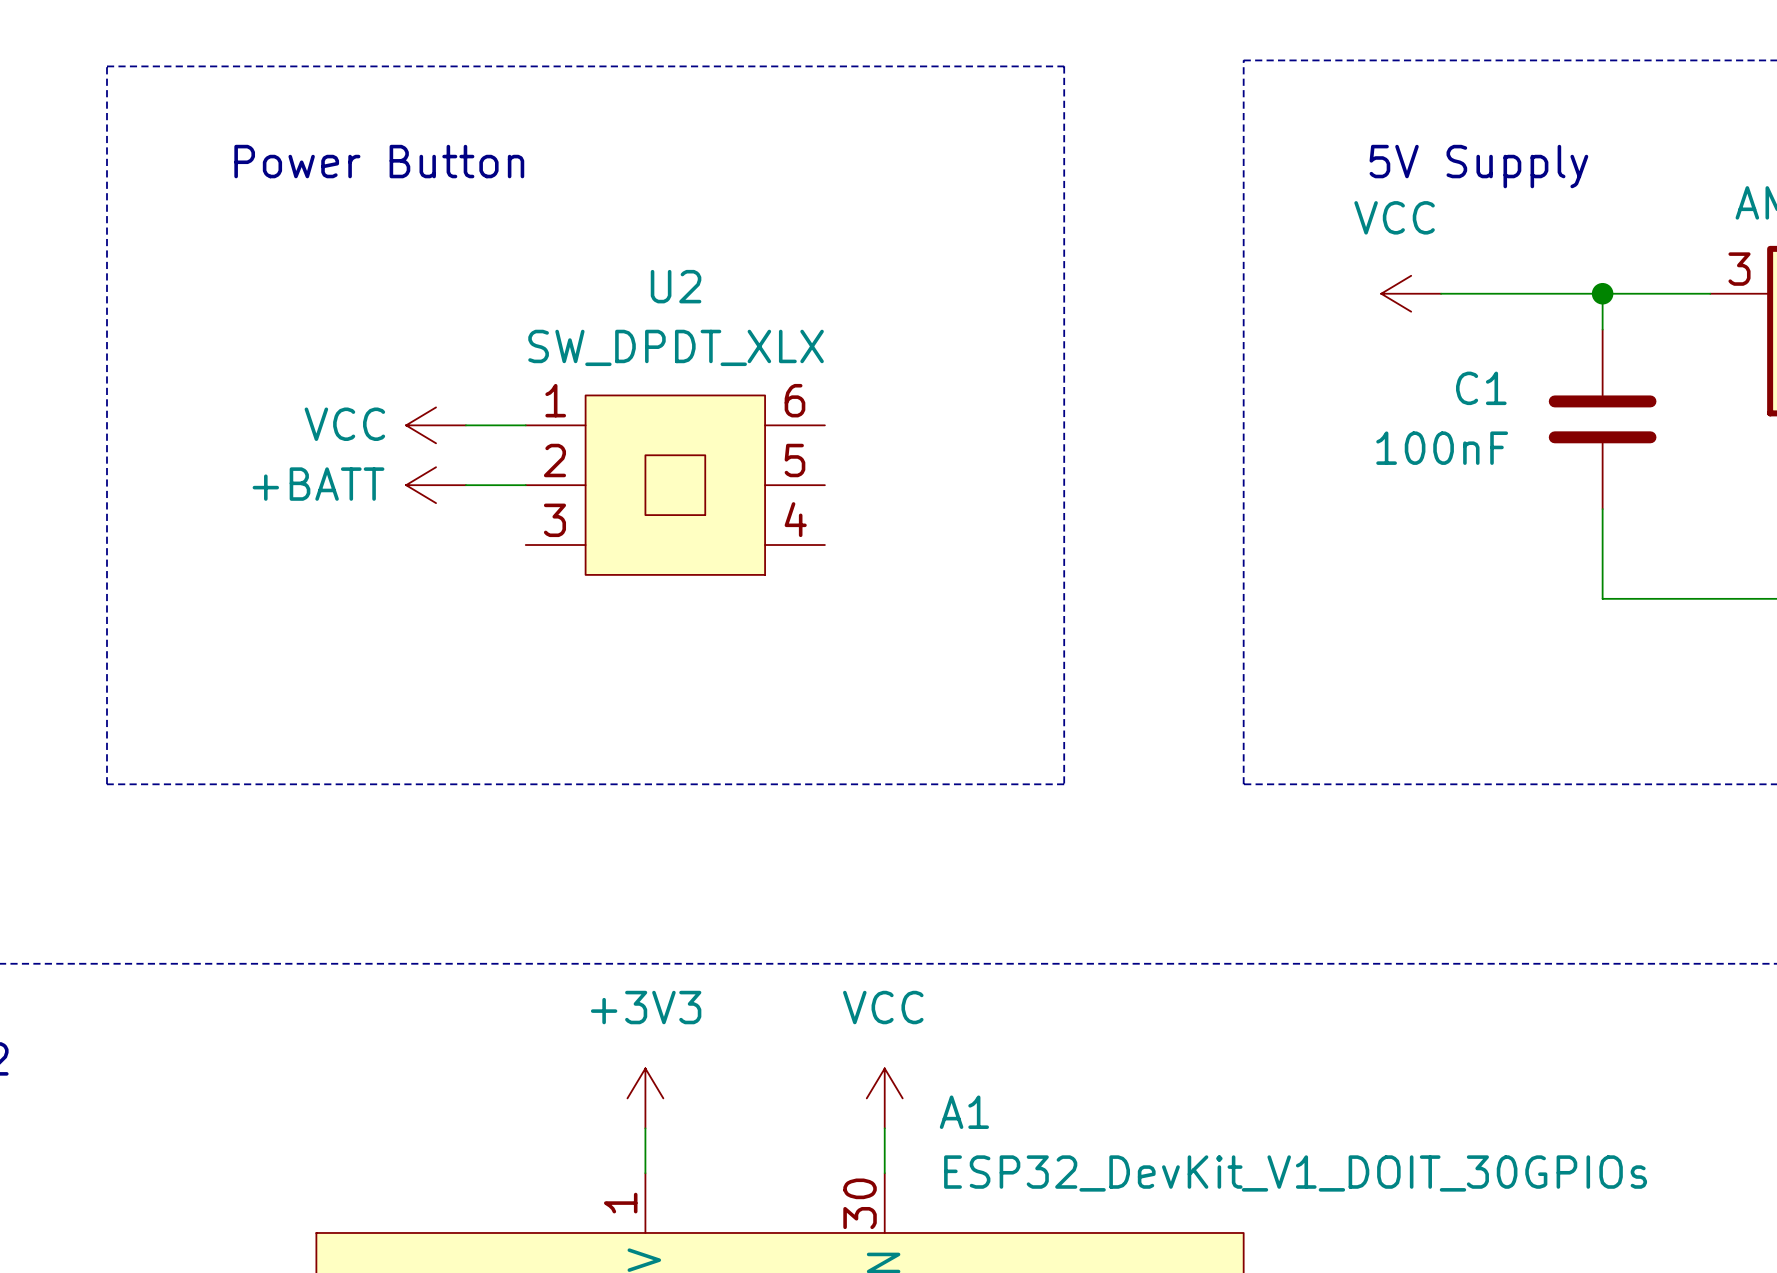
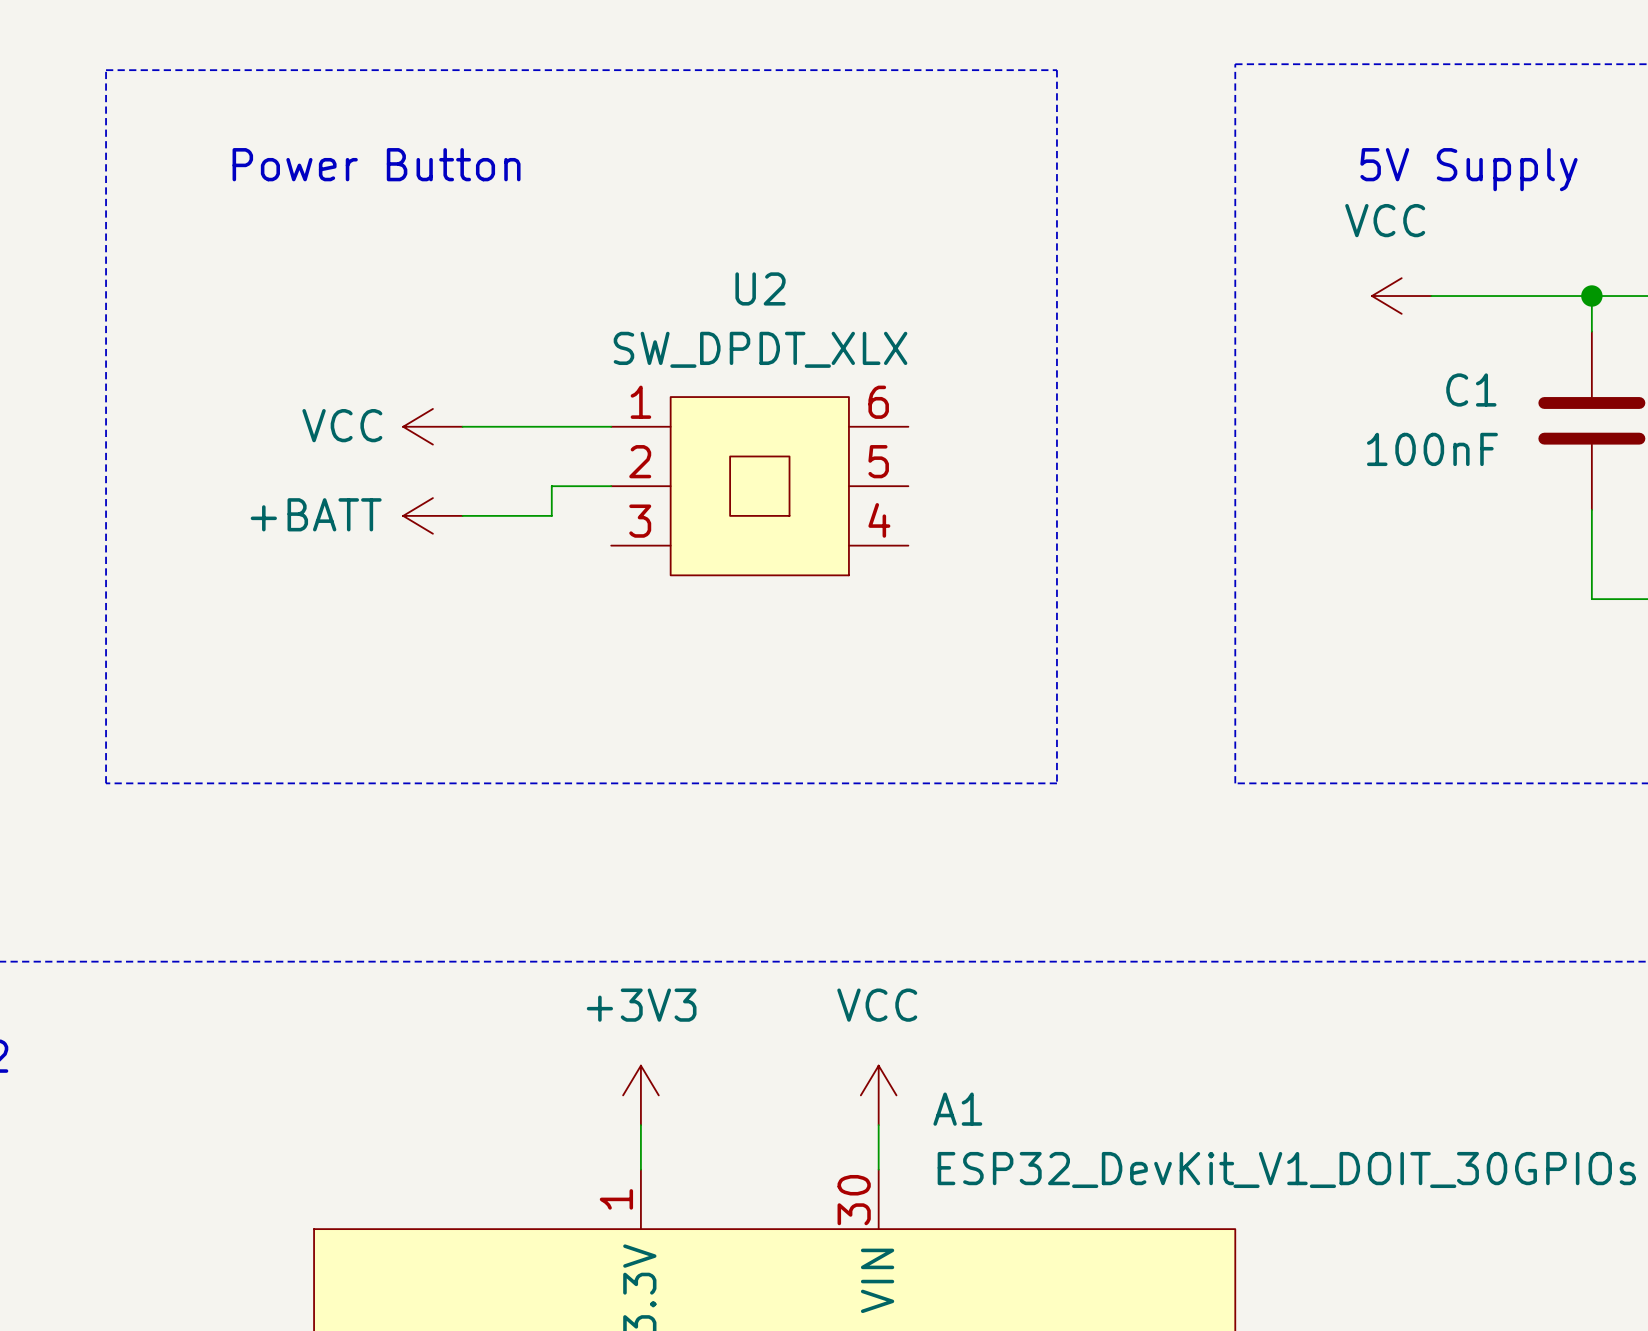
power symbol position: +BATT (436, 485) -> +BATT (432, 515)
wire: (465, 485) (525, 485) -> none
wire: none -> (611, 486) (551, 486) (551, 515) (462, 515)
U2 position: (675, 485) -> (759, 486)

